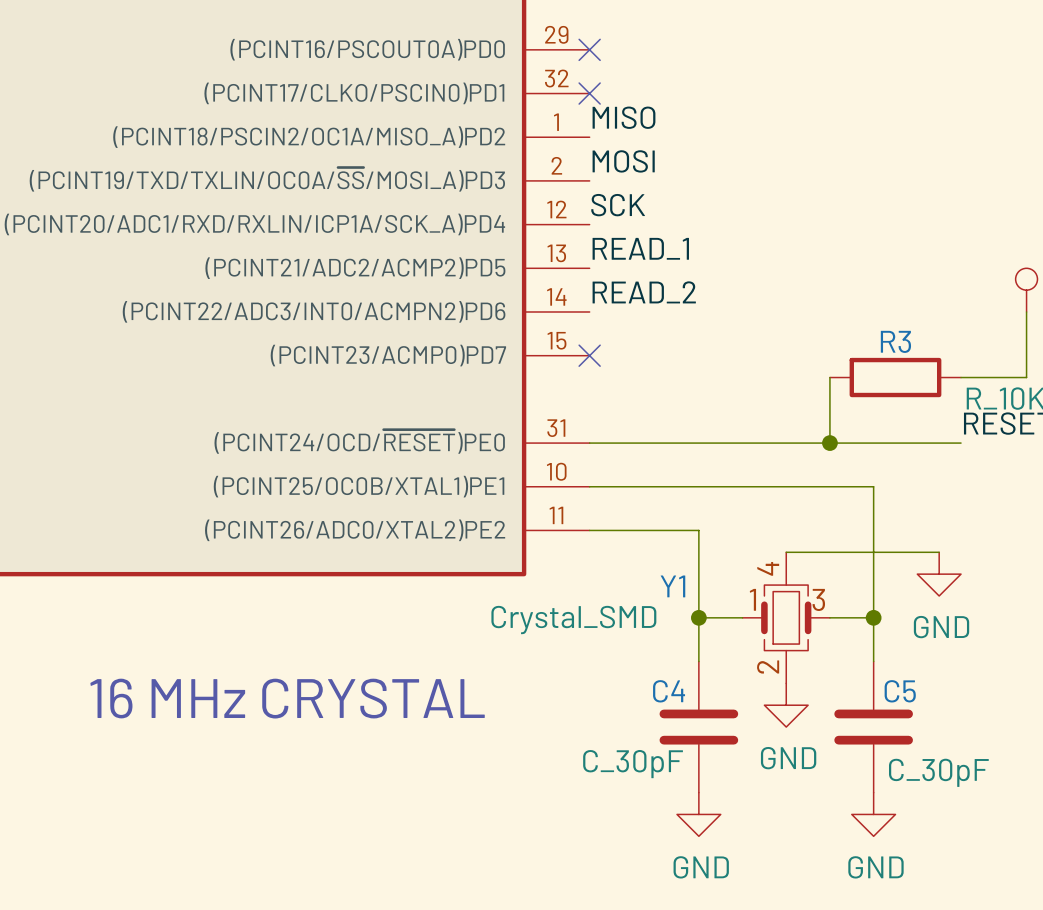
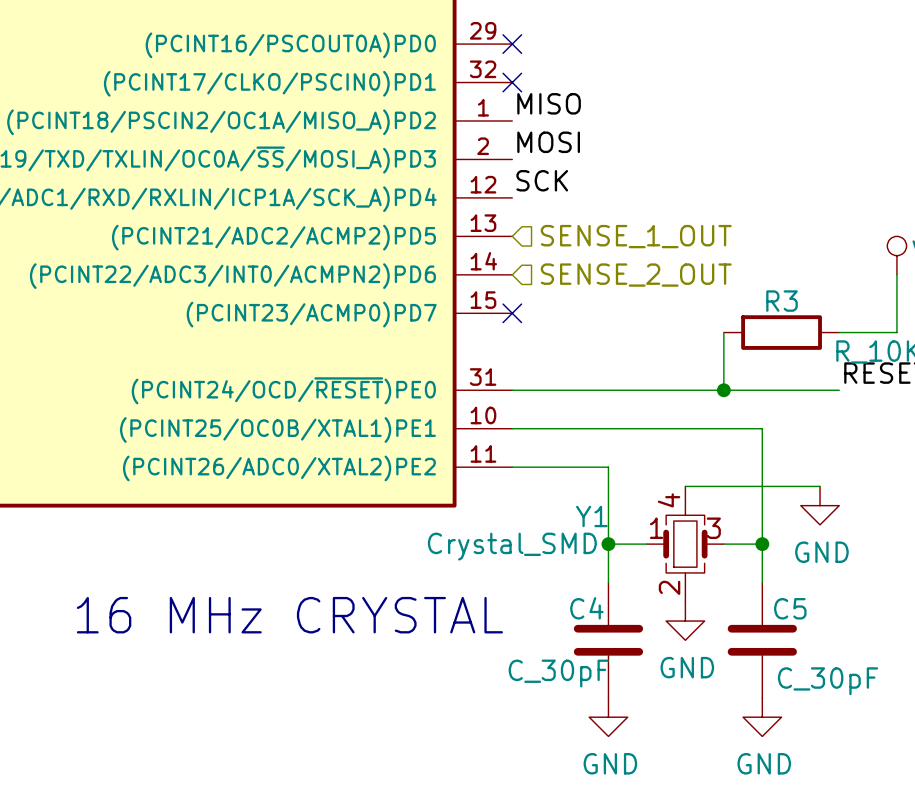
label: READ_1 (640, 248) -> none
hierarchical label: none -> SENSE_1_OUT (636, 236)
label: READ_2 (644, 292) -> none
hierarchical label: none -> SENSE_2_OUT (636, 275)

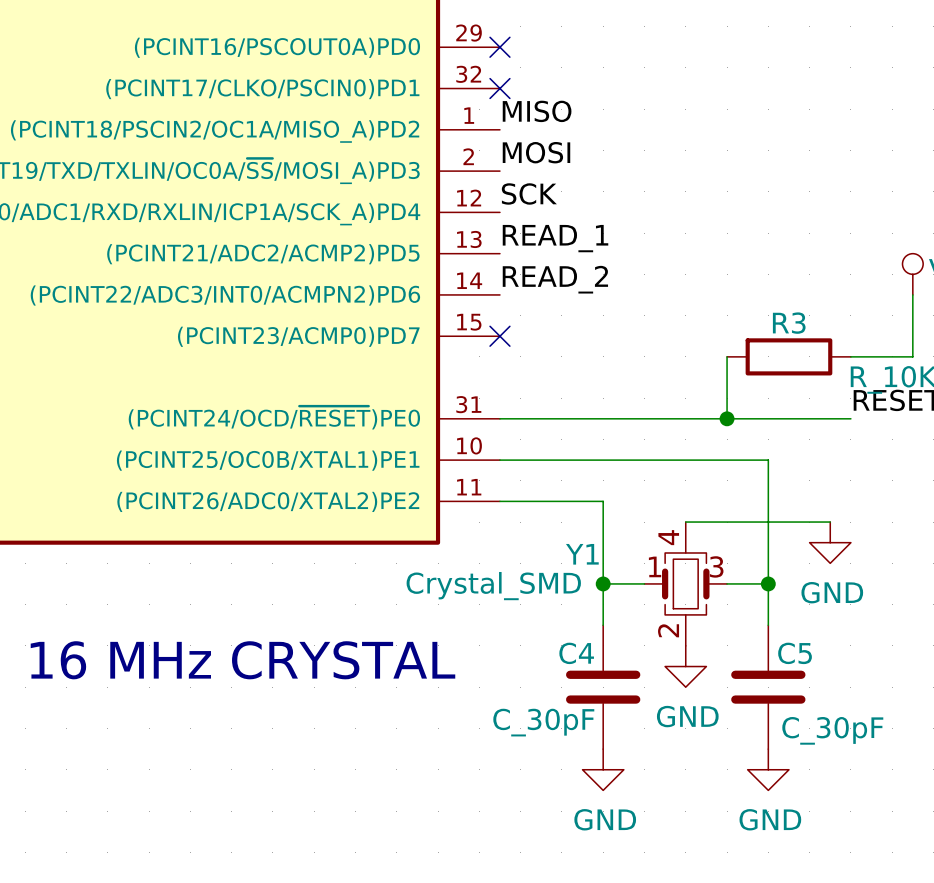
label: none -> READ_1 (555, 238)
hierarchical label: SENSE_1_OUT (636, 236) -> none
label: none -> READ_2 (555, 279)
hierarchical label: SENSE_2_OUT (636, 275) -> none

